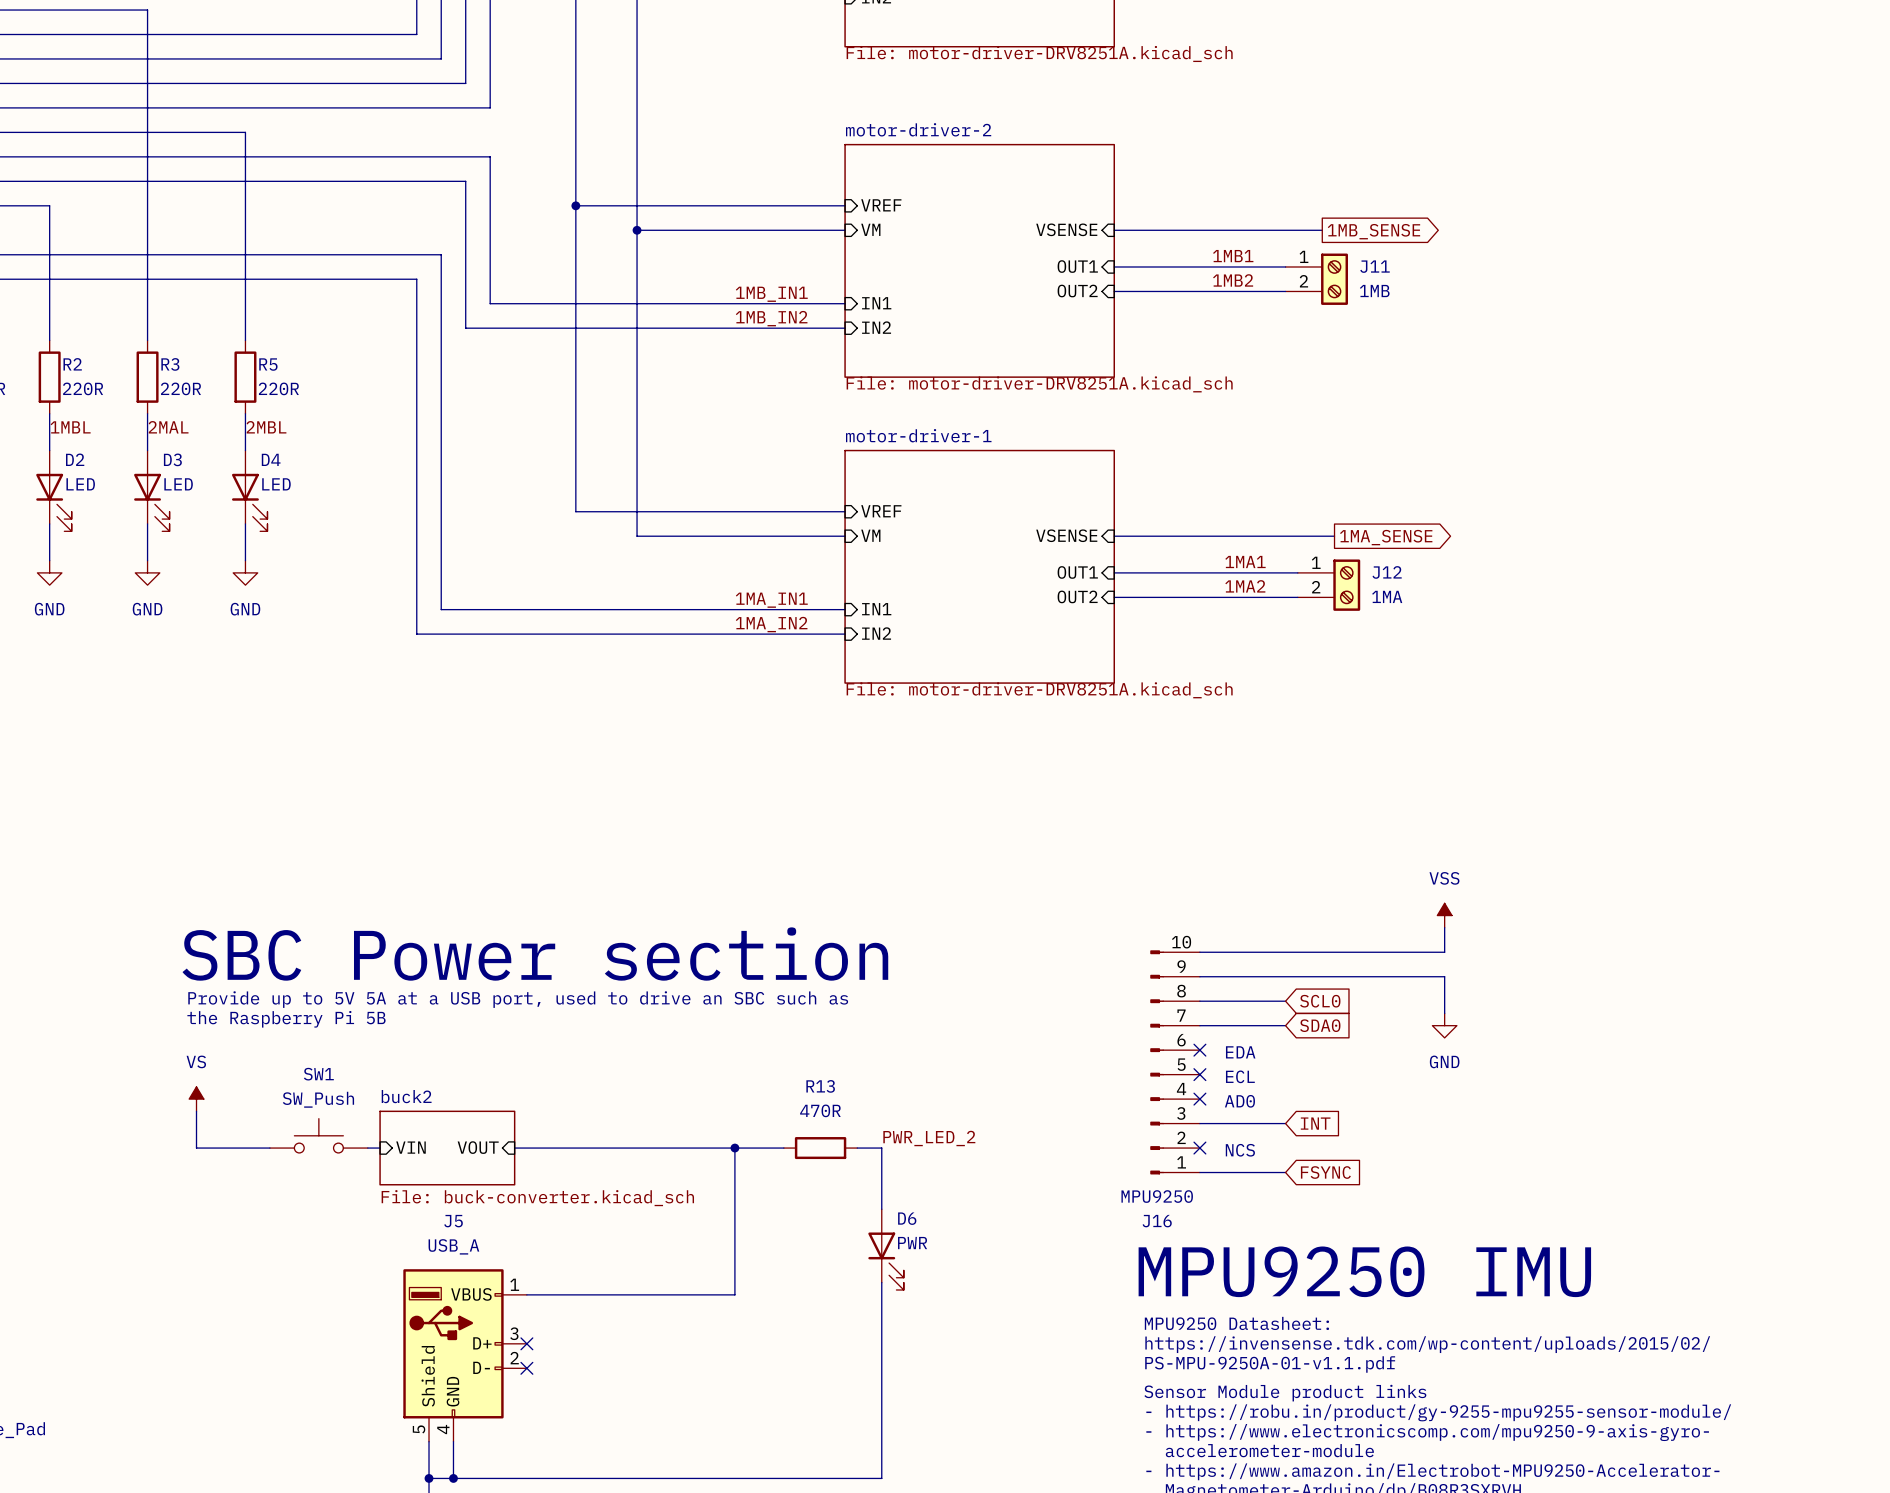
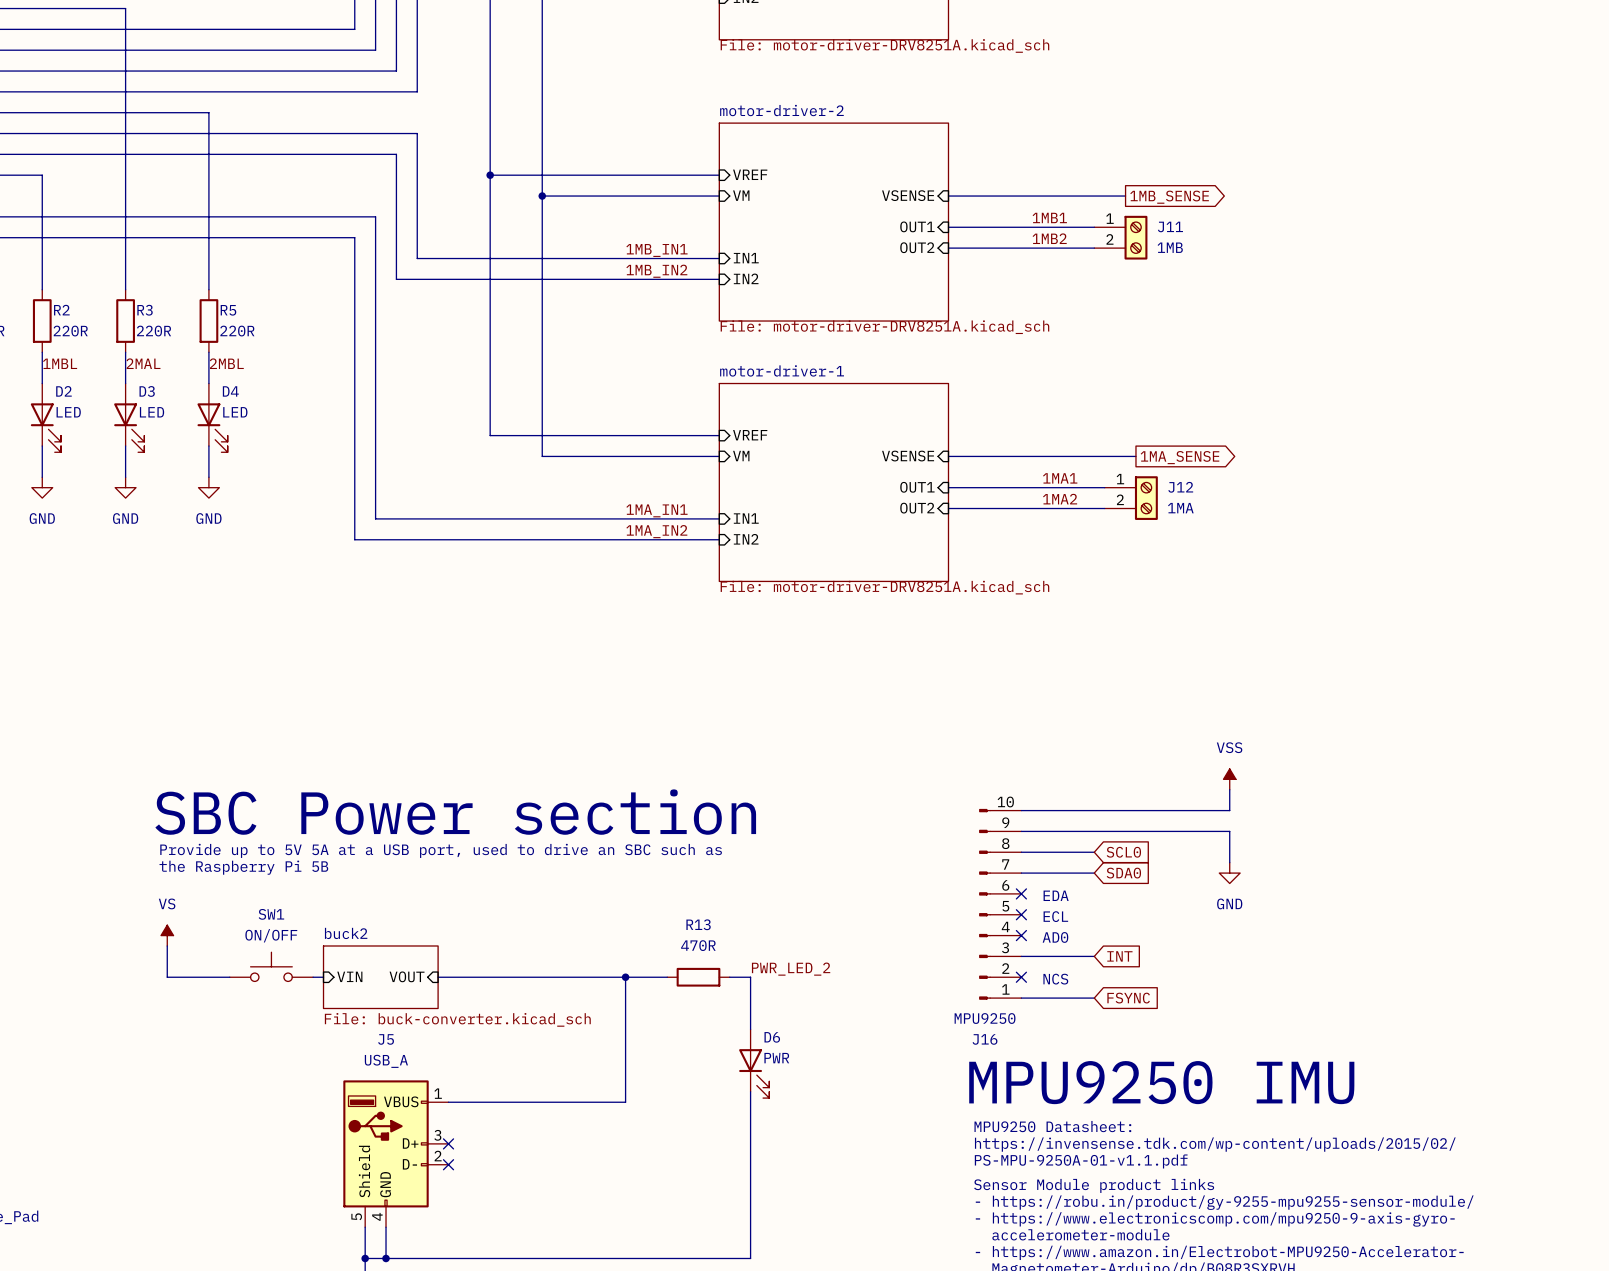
SW1 value: SW_Push (318, 1099) -> ON/OFF (271, 935)

